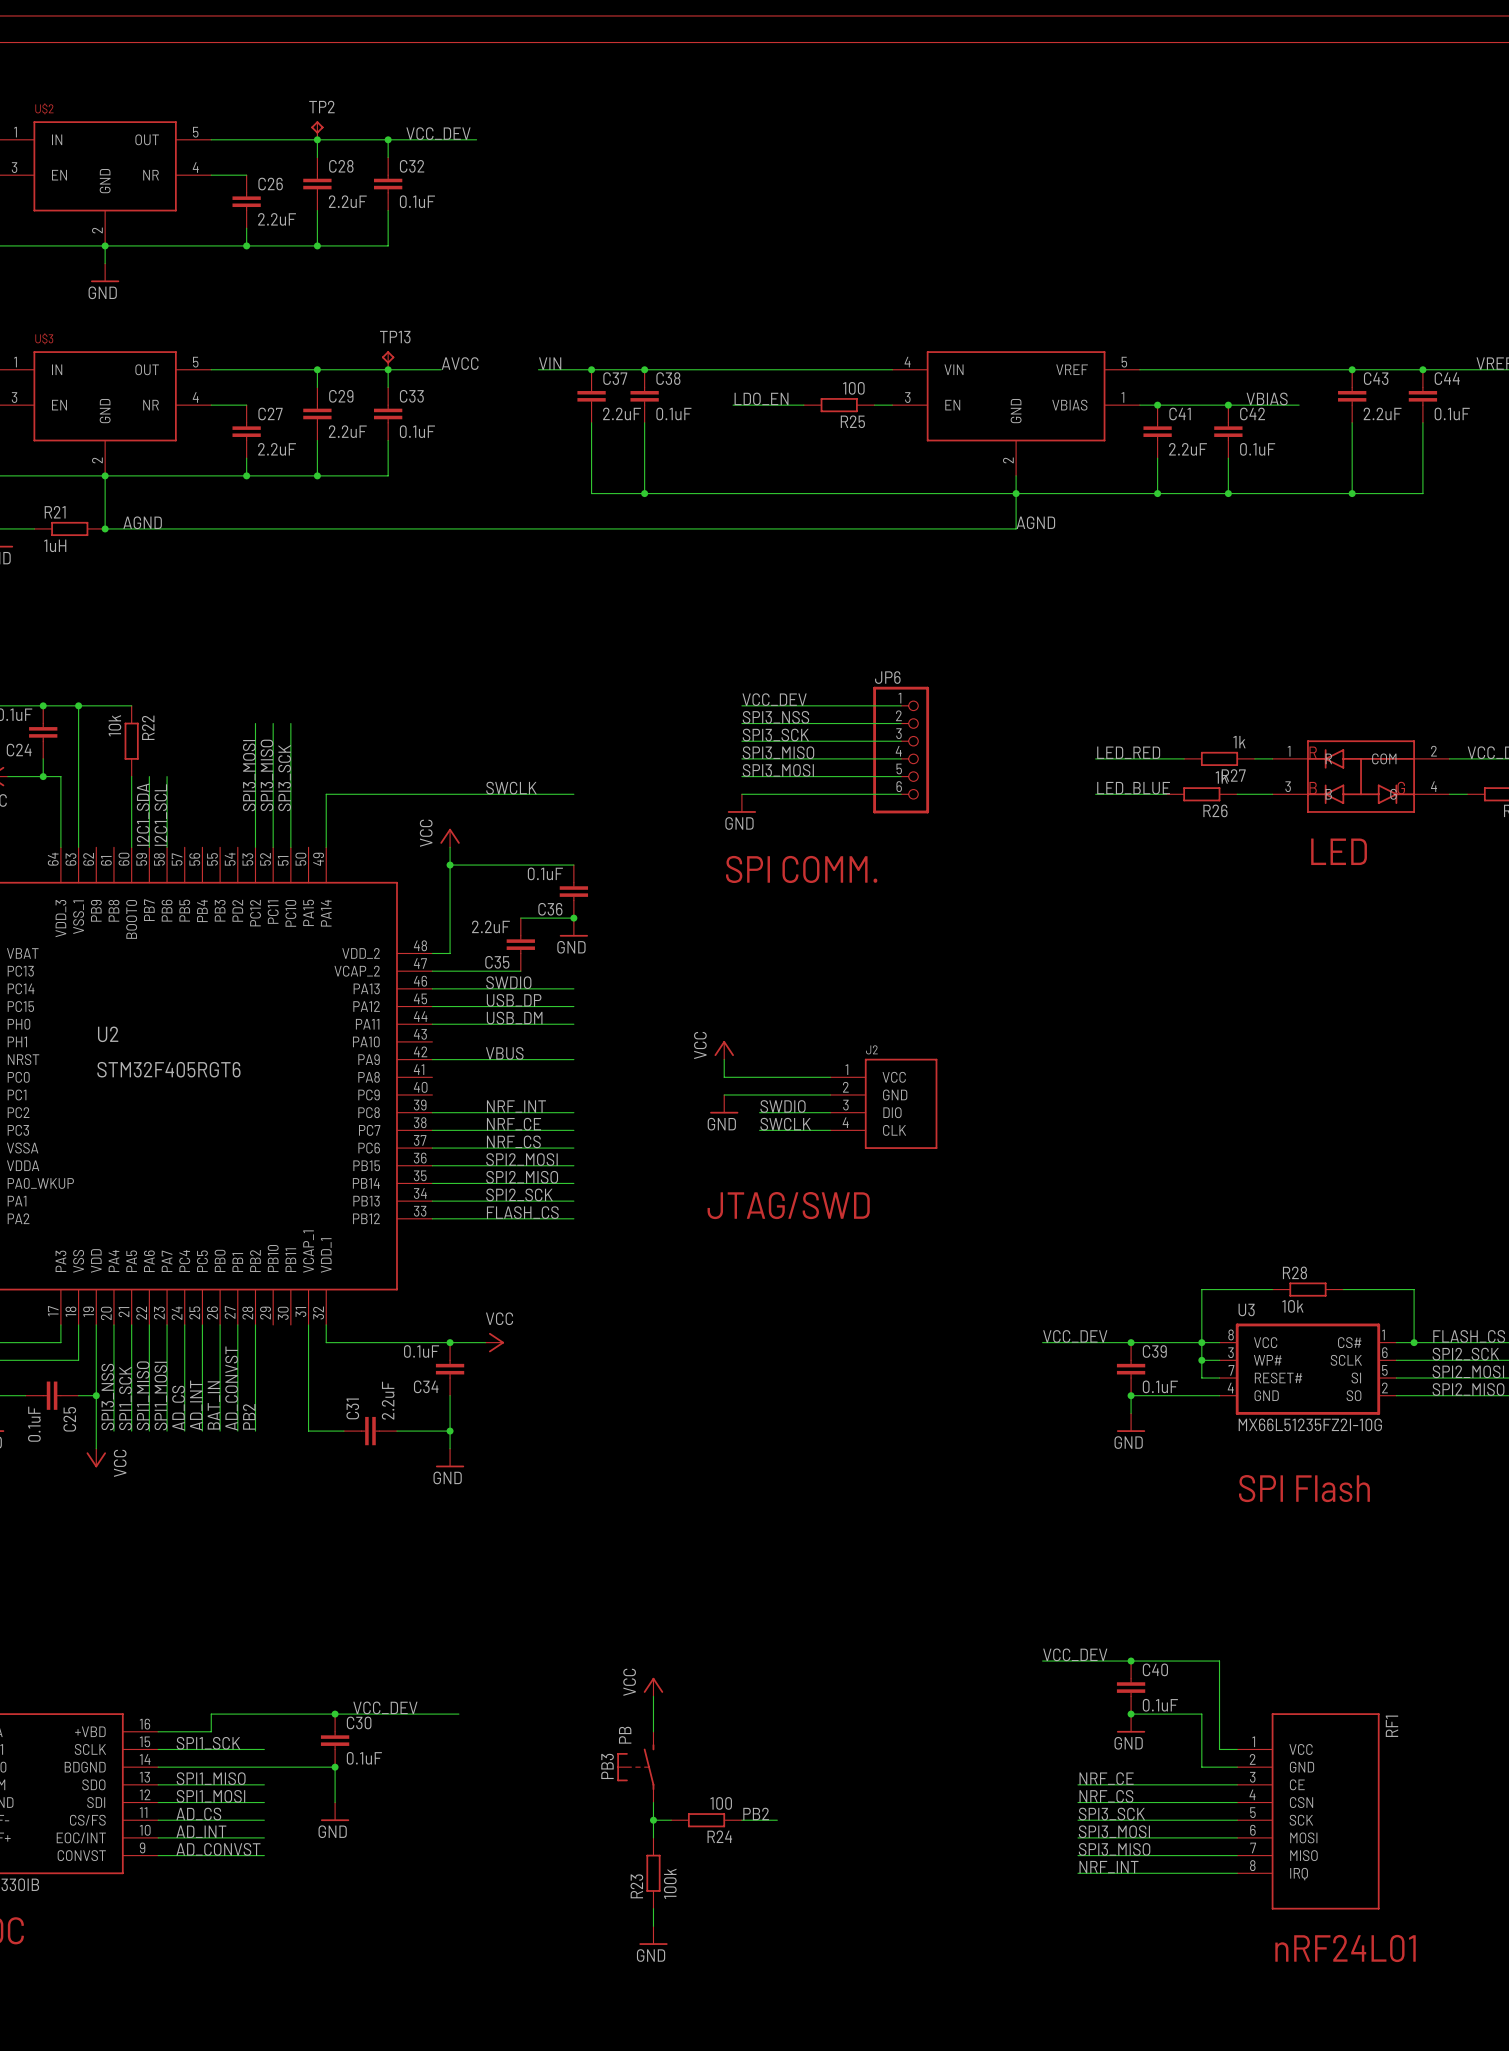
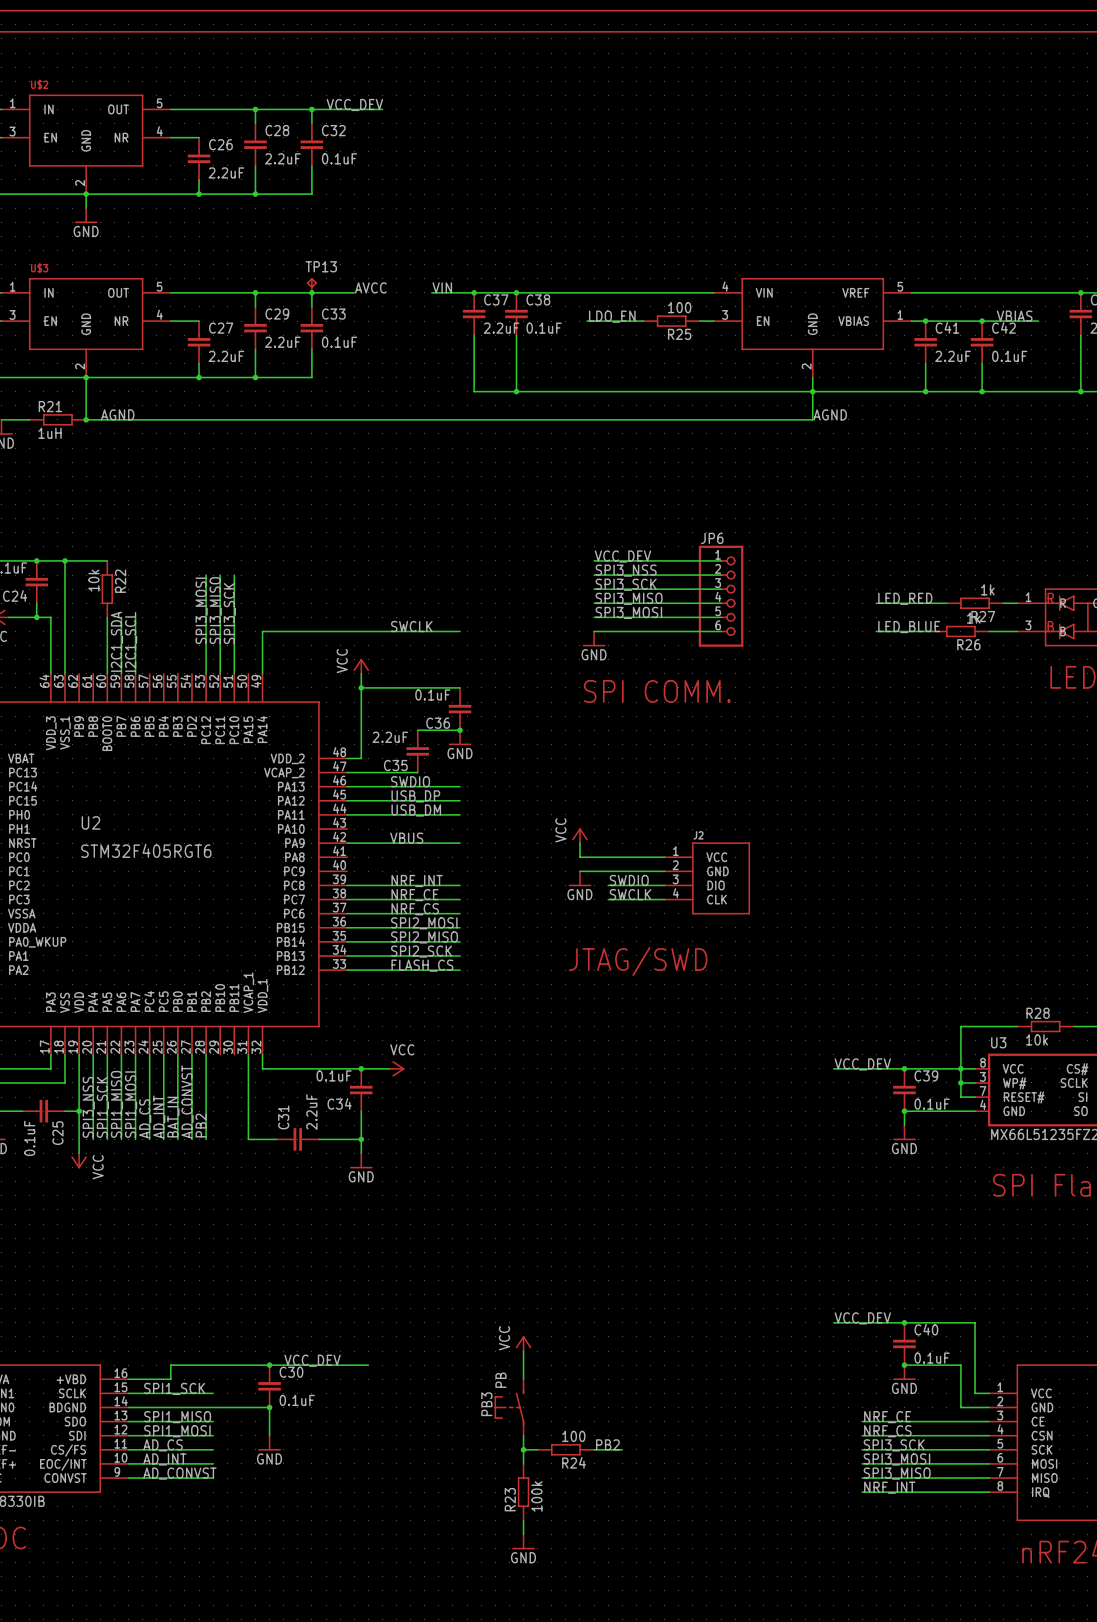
TP2: (317, 130) -> none

